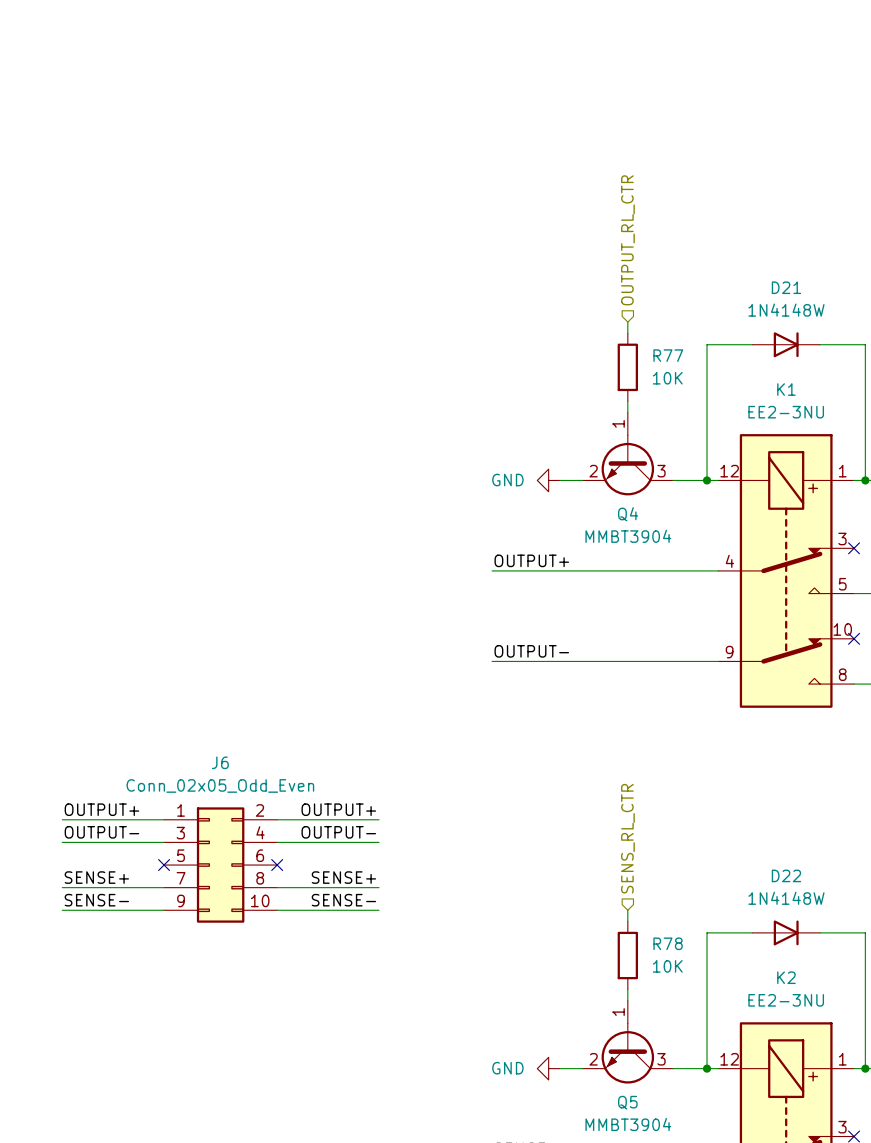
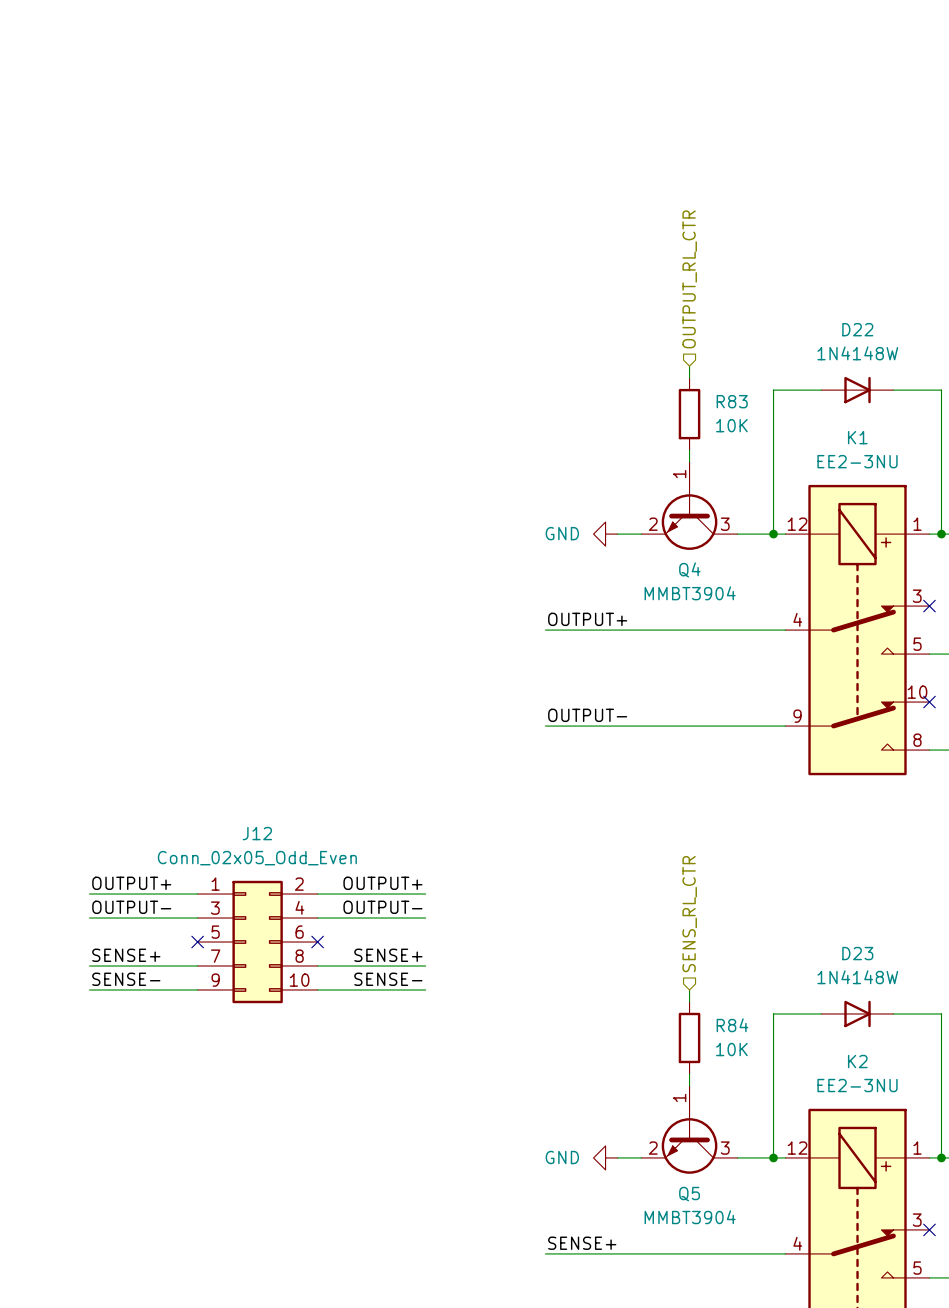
D21 name: D21 (786, 287) -> D22 (857, 329)
R77 name: R77 (668, 355) -> R83 (732, 401)
J6 name: J6 (220, 762) -> J12 (257, 833)
D22 name: D22 (786, 875) -> D23 (857, 953)
R78 name: R78 (668, 943) -> R84 (732, 1025)

